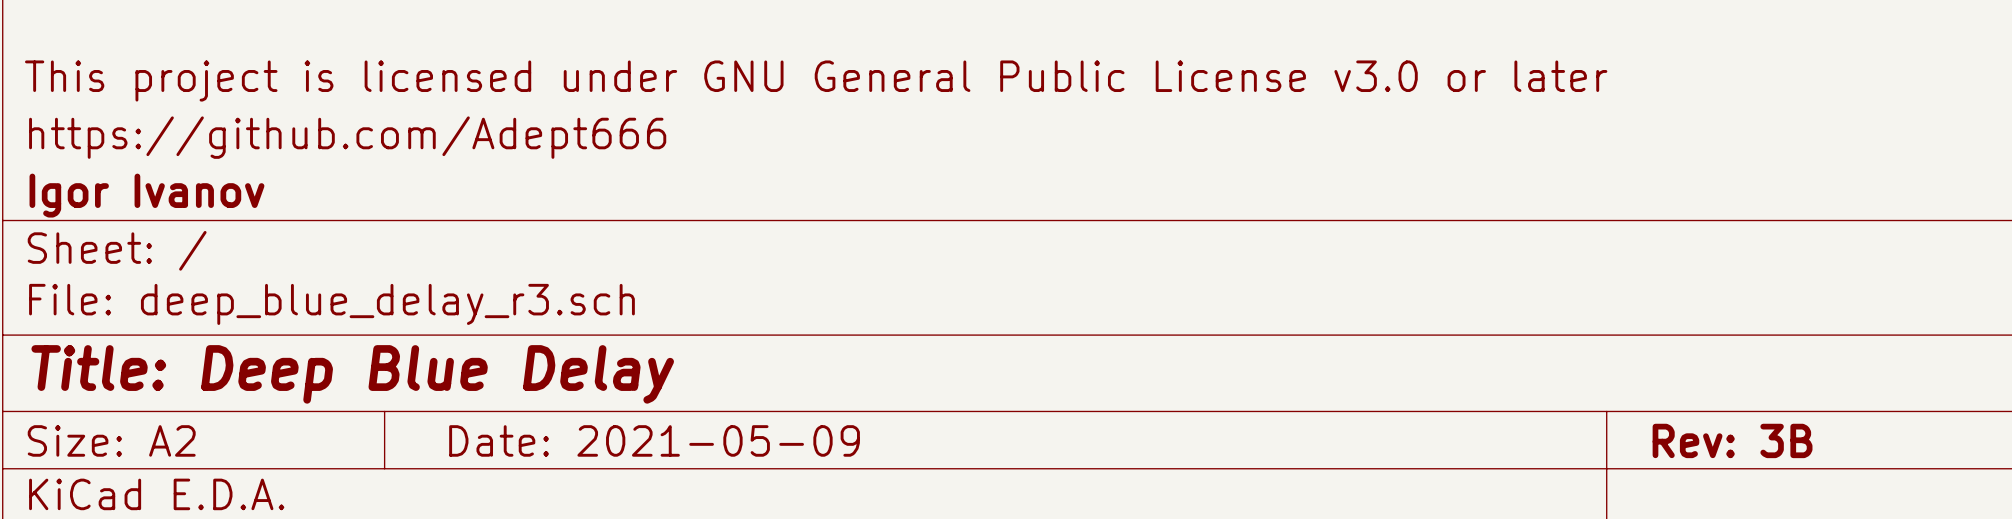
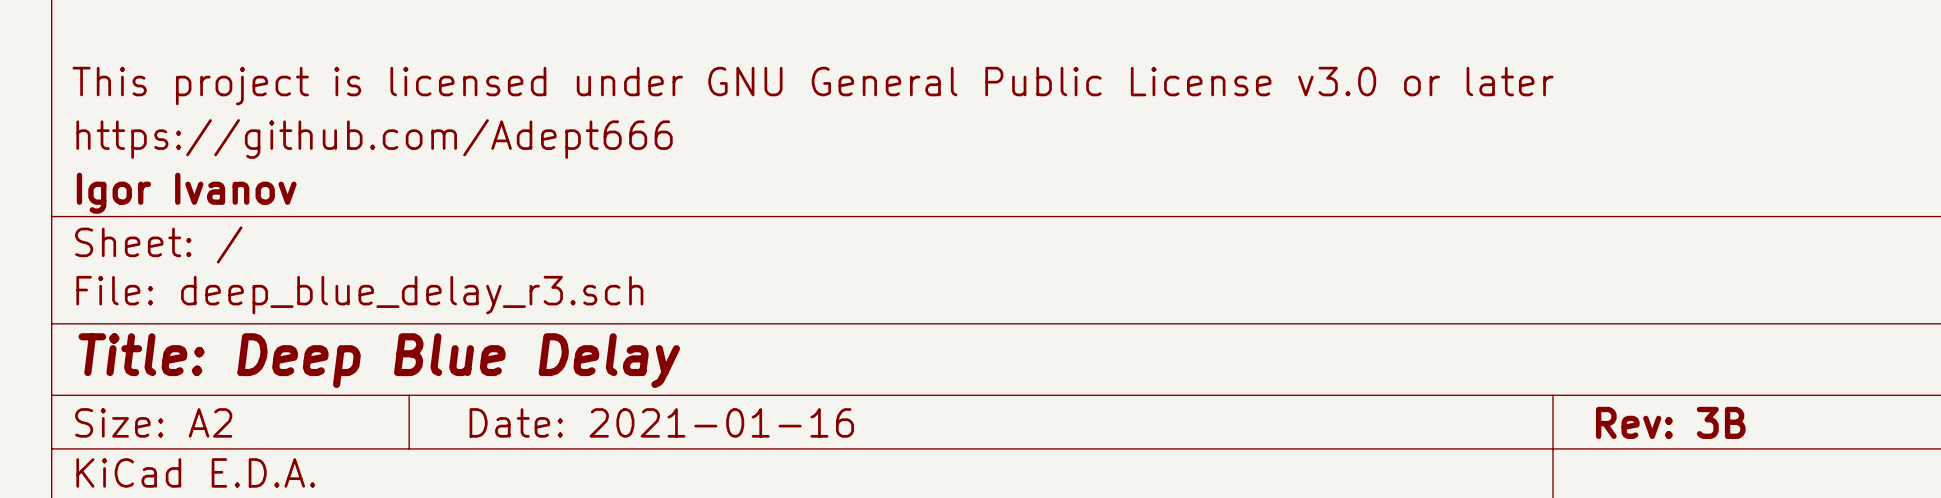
title block: Date: 2021-05-09 (654, 440) -> Date: 2021-01-16 (661, 422)

